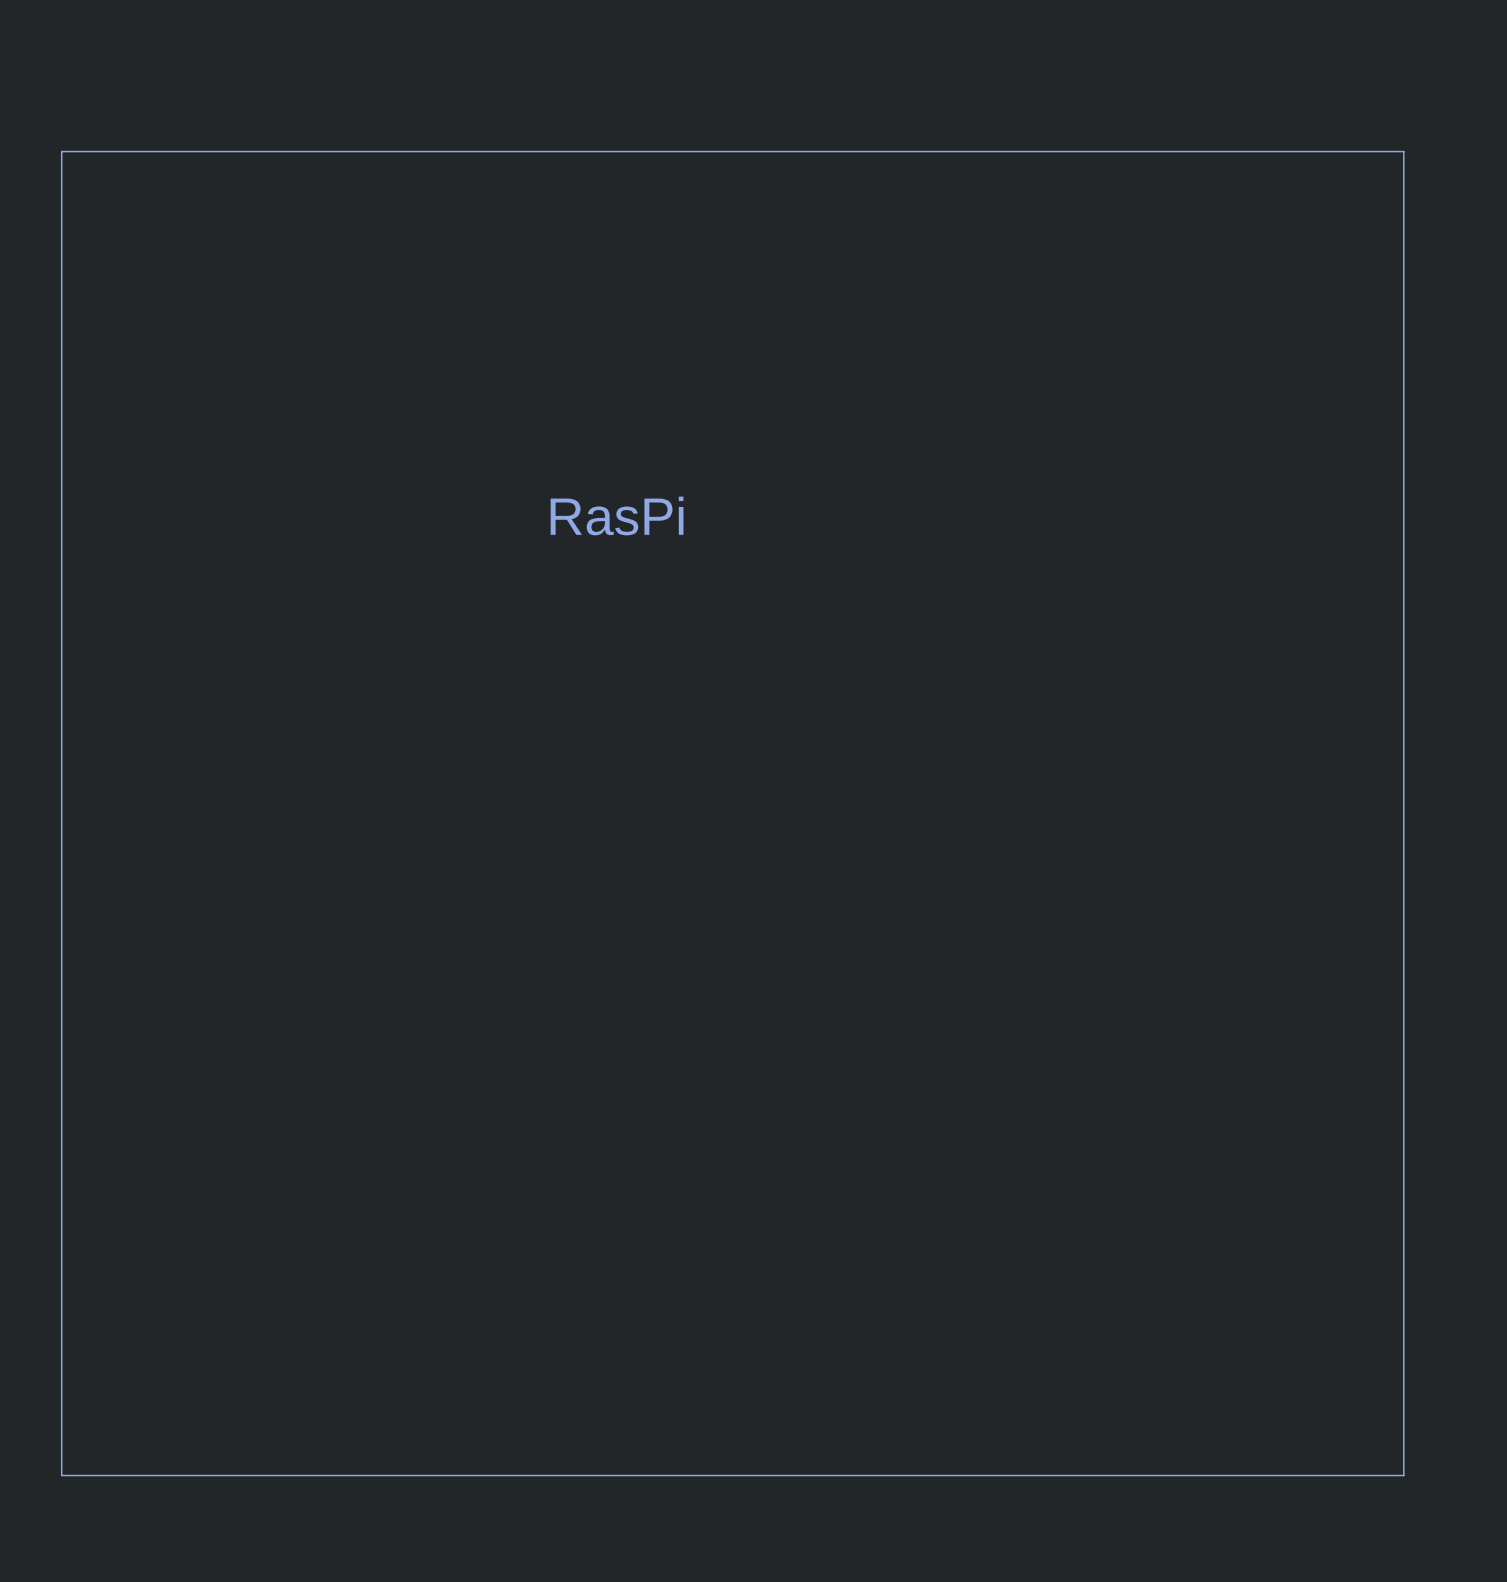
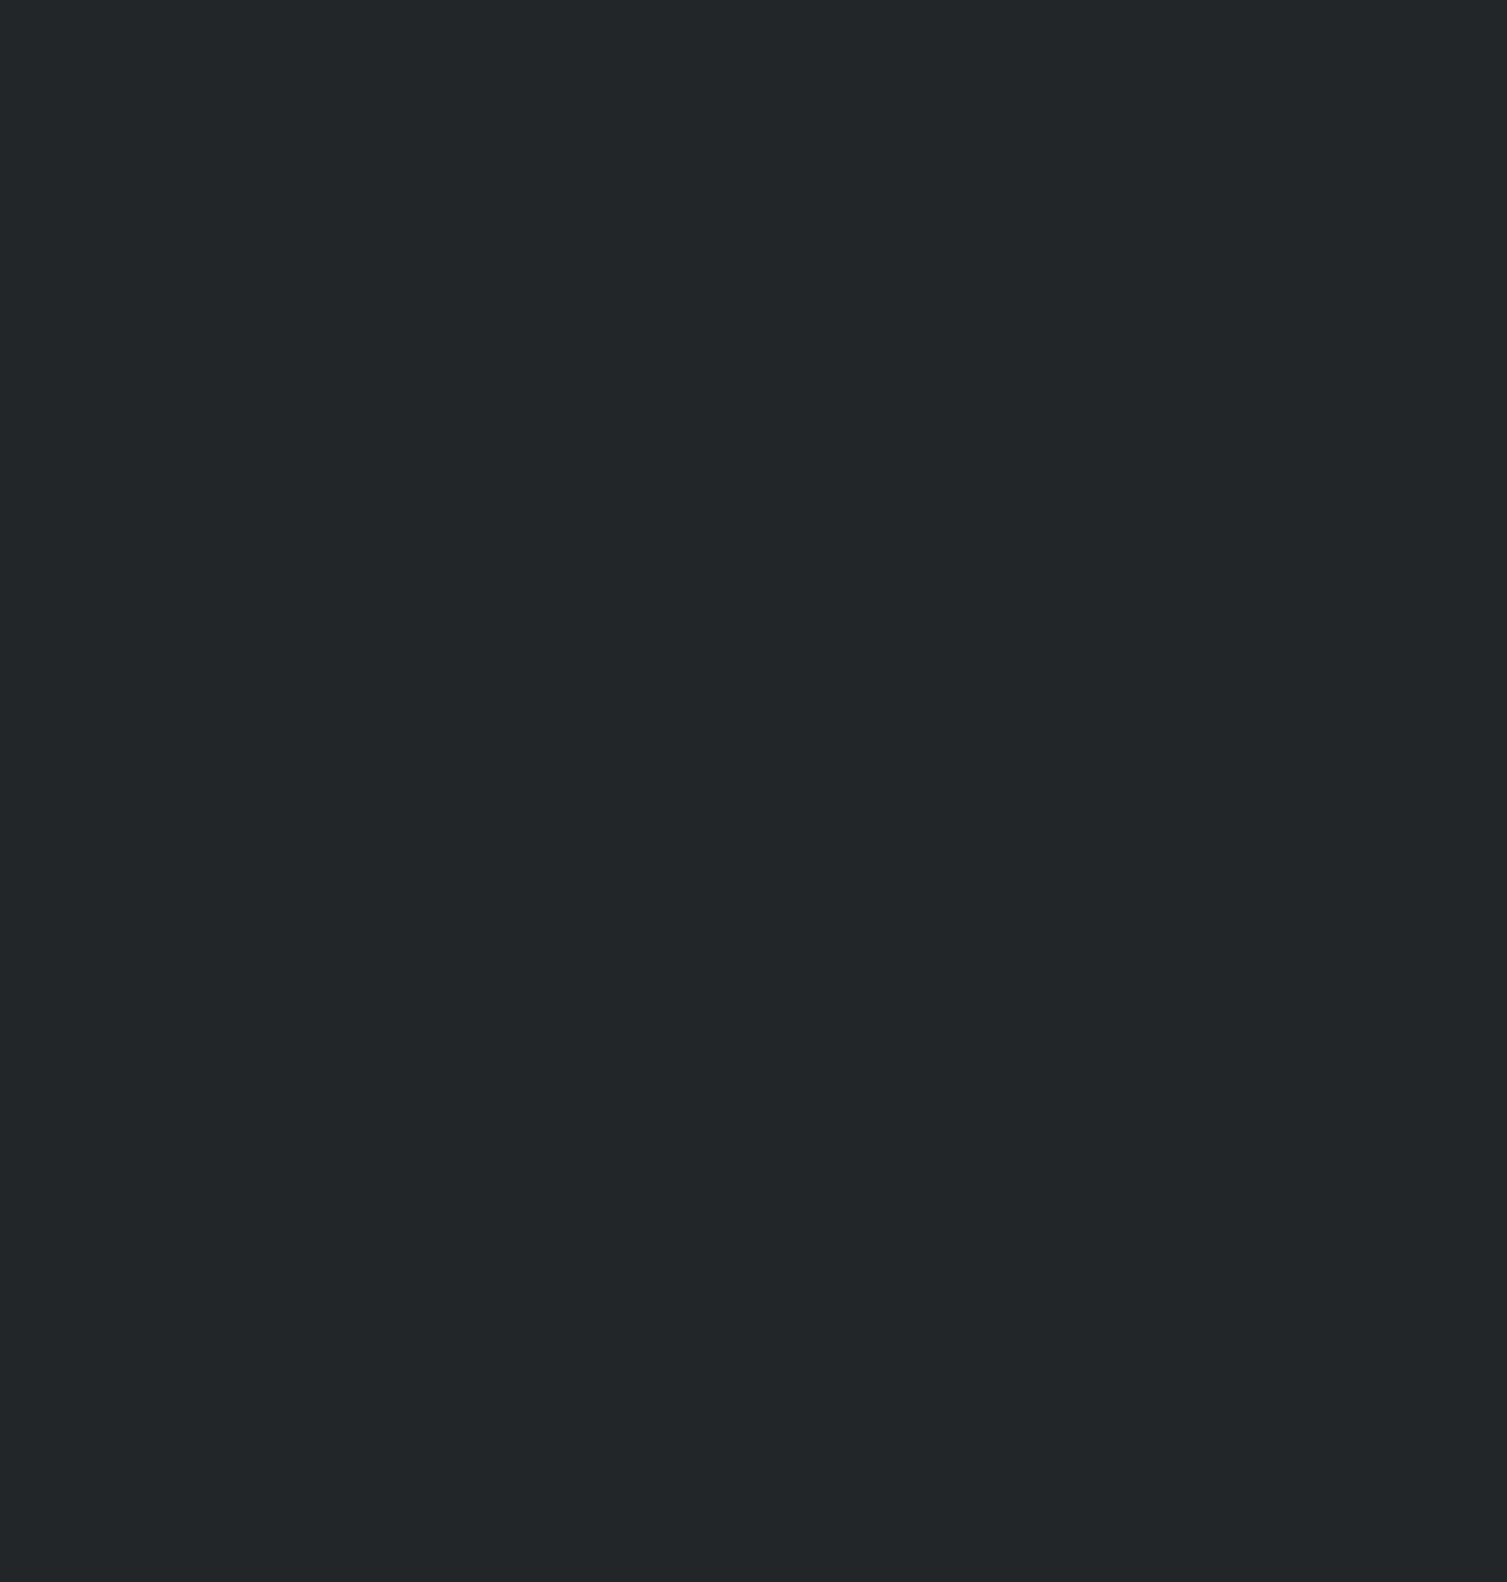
line: (61, 151) (1403, 151) (1403, 1475) (61, 1475) (61, 151) -> none
text: RasPi (617, 515) -> none

